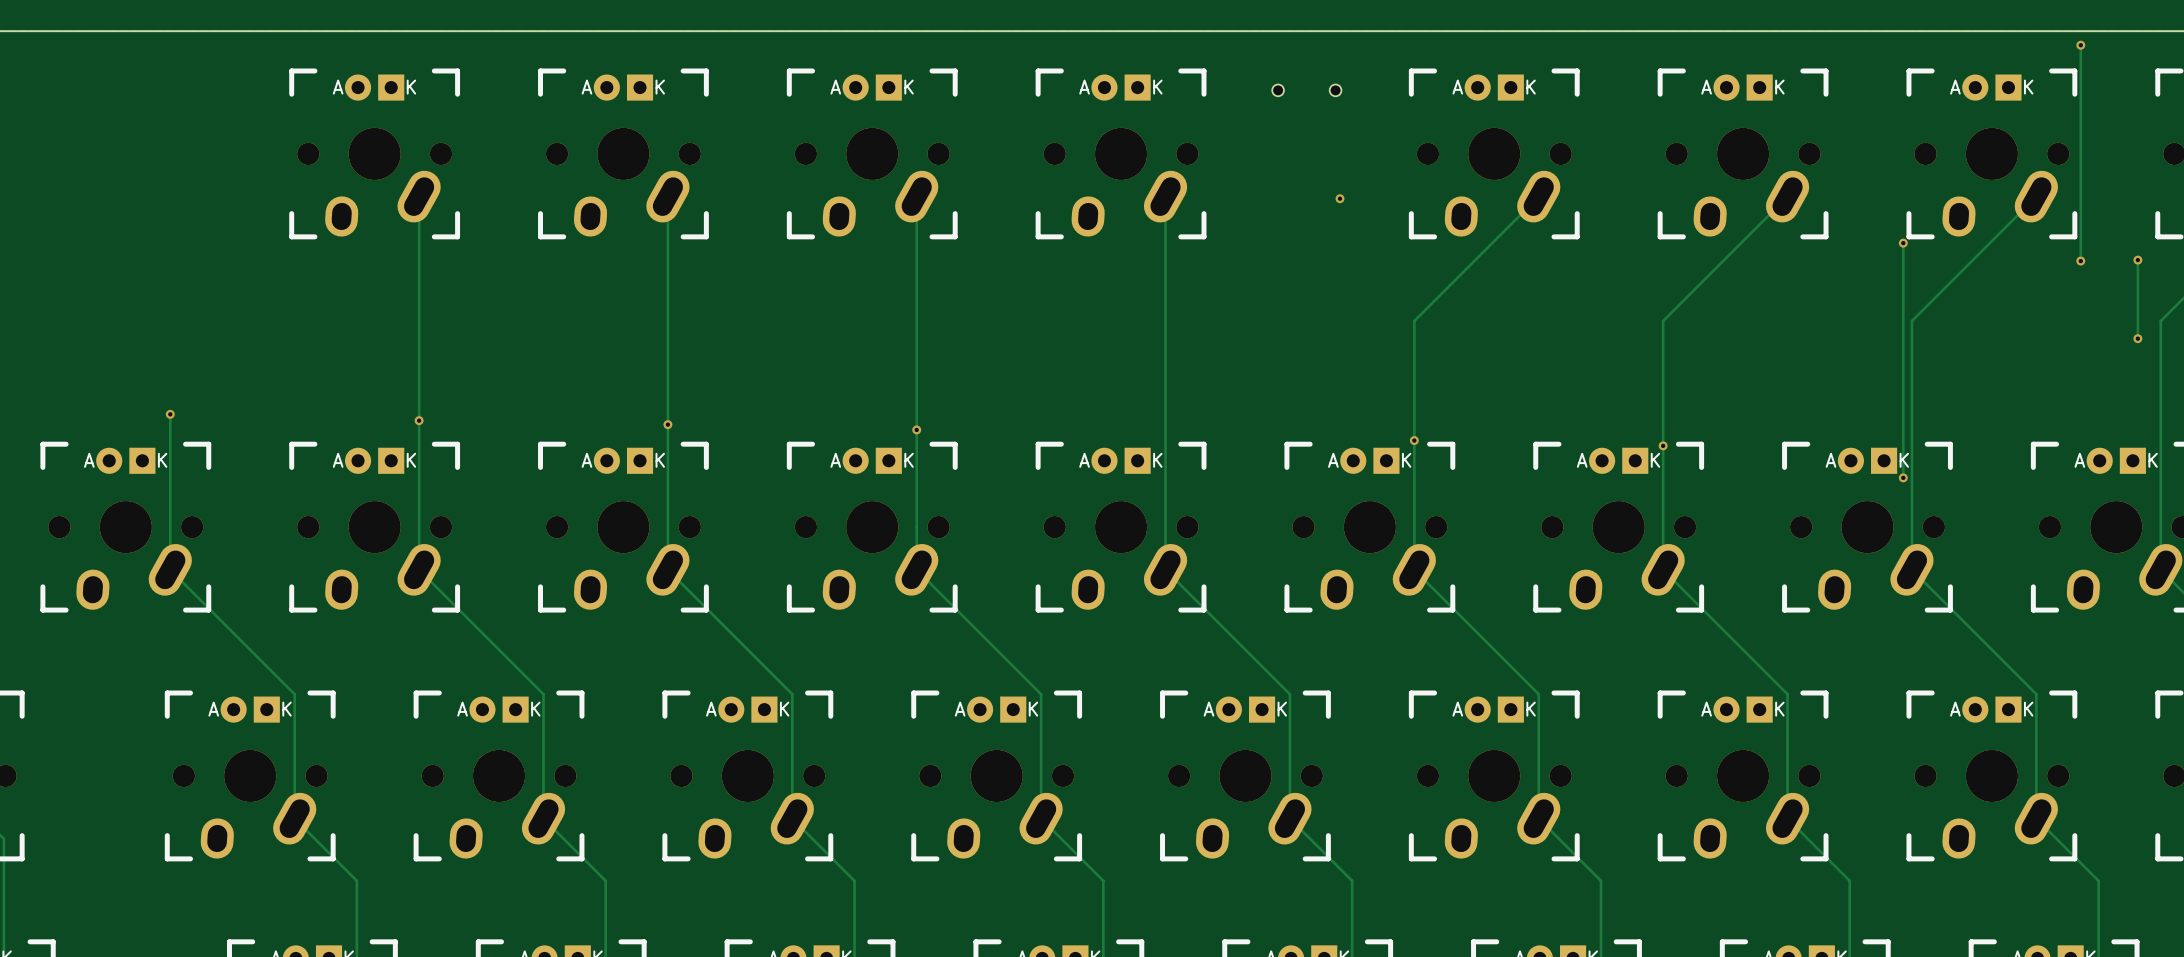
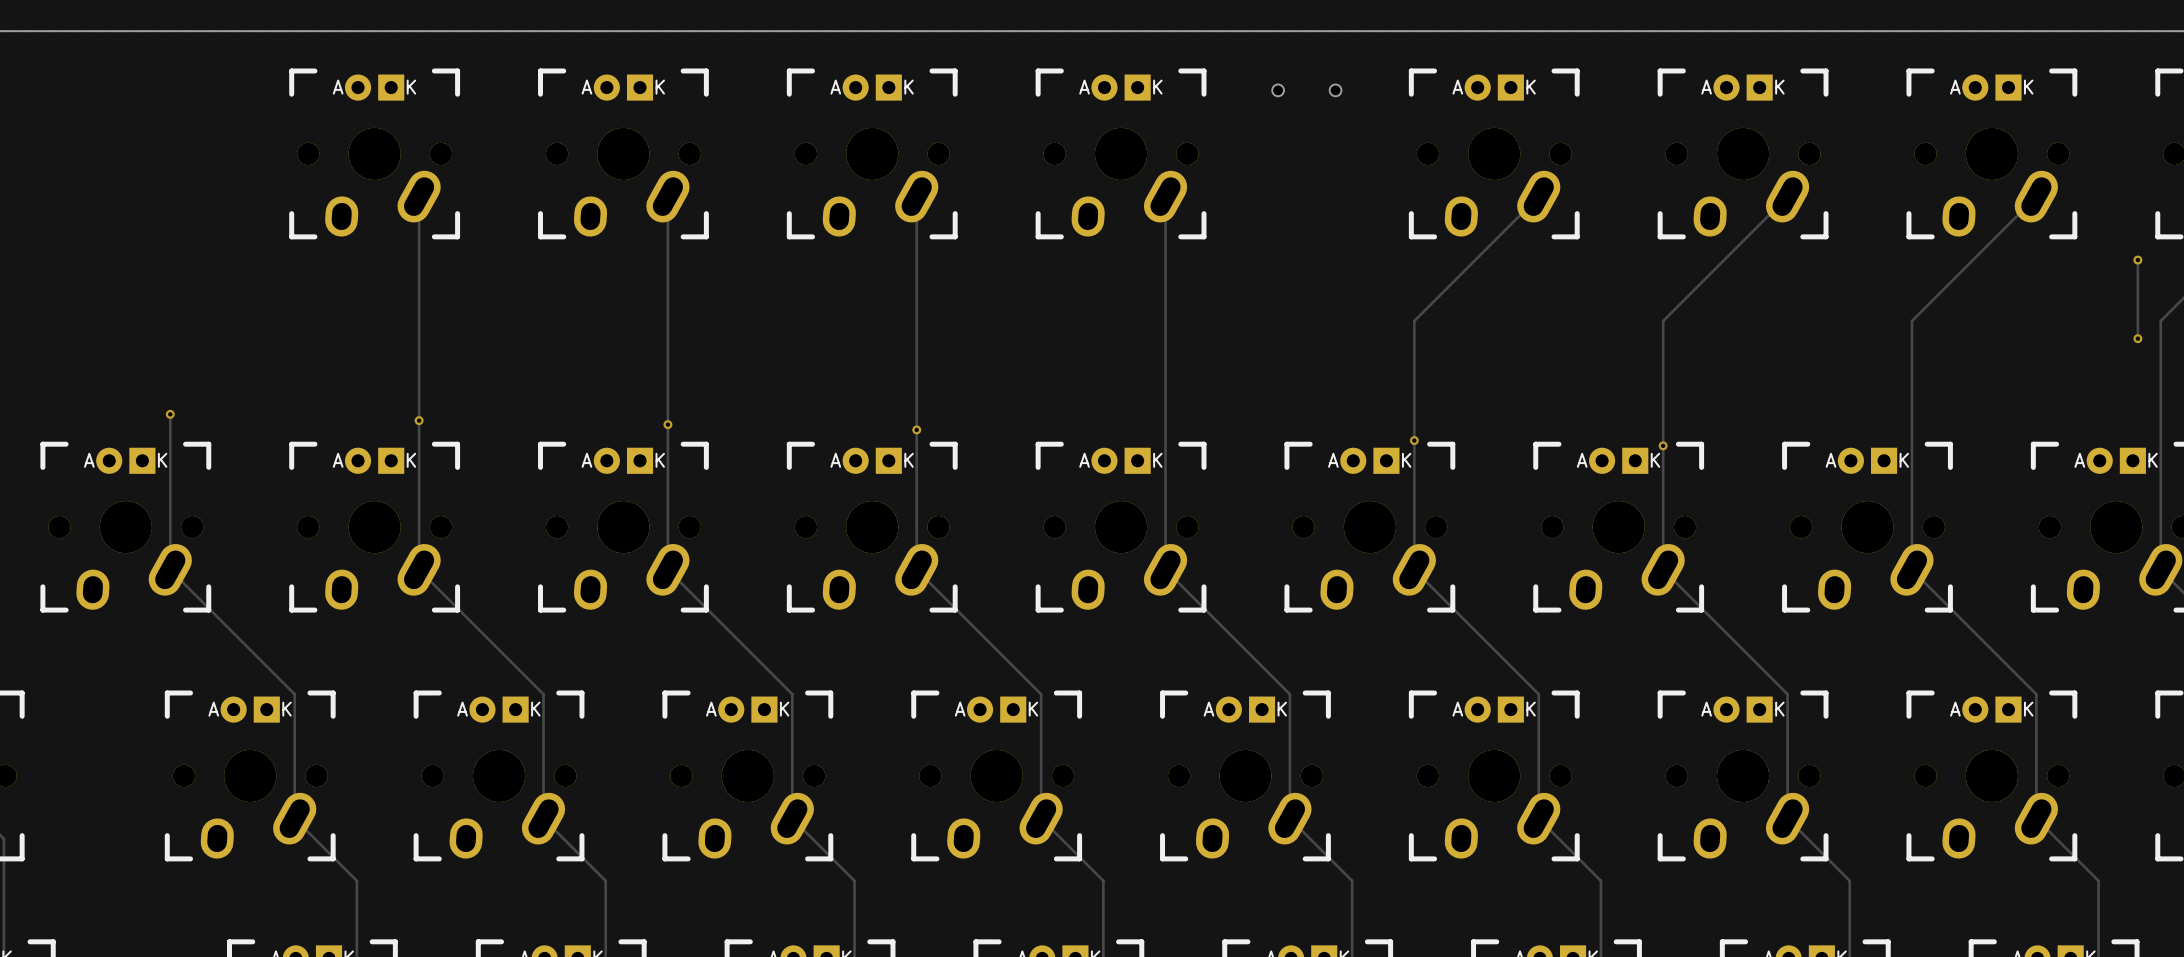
track: (2080, 45) (2080, 261) -> none
via: (2080, 45) -> none
via: (1340, 198) -> none
track: (1903, 243) (1903, 477) -> none
via: (1903, 243) -> none
via: (2080, 261) -> none
via: (1903, 477) -> none

